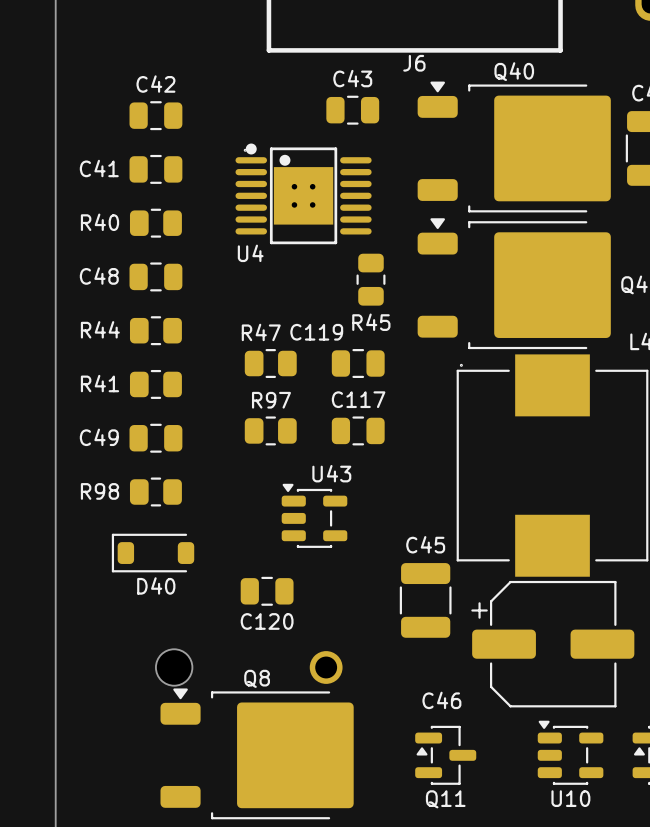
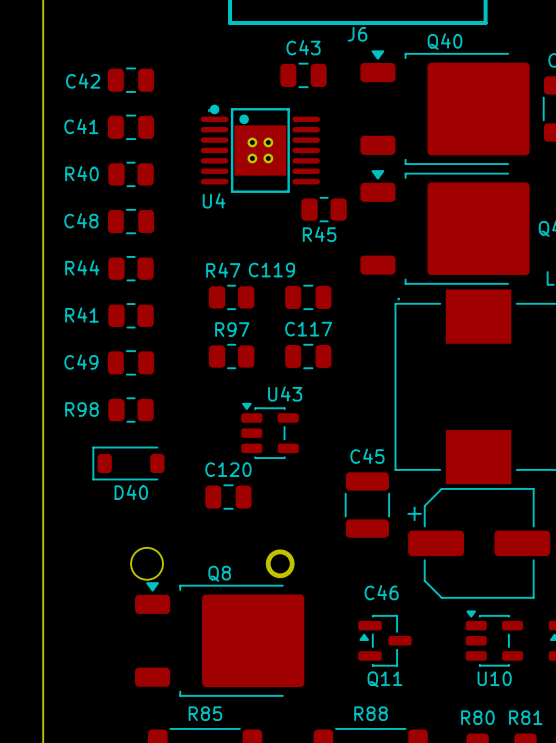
C42 name position: C42 (155, 84) -> C42 (83, 81)
R45 rotation: 0° (370, 279) -> 90° clockwise (324, 209)
C120 name position: C120 (267, 621) -> C120 (228, 469)

